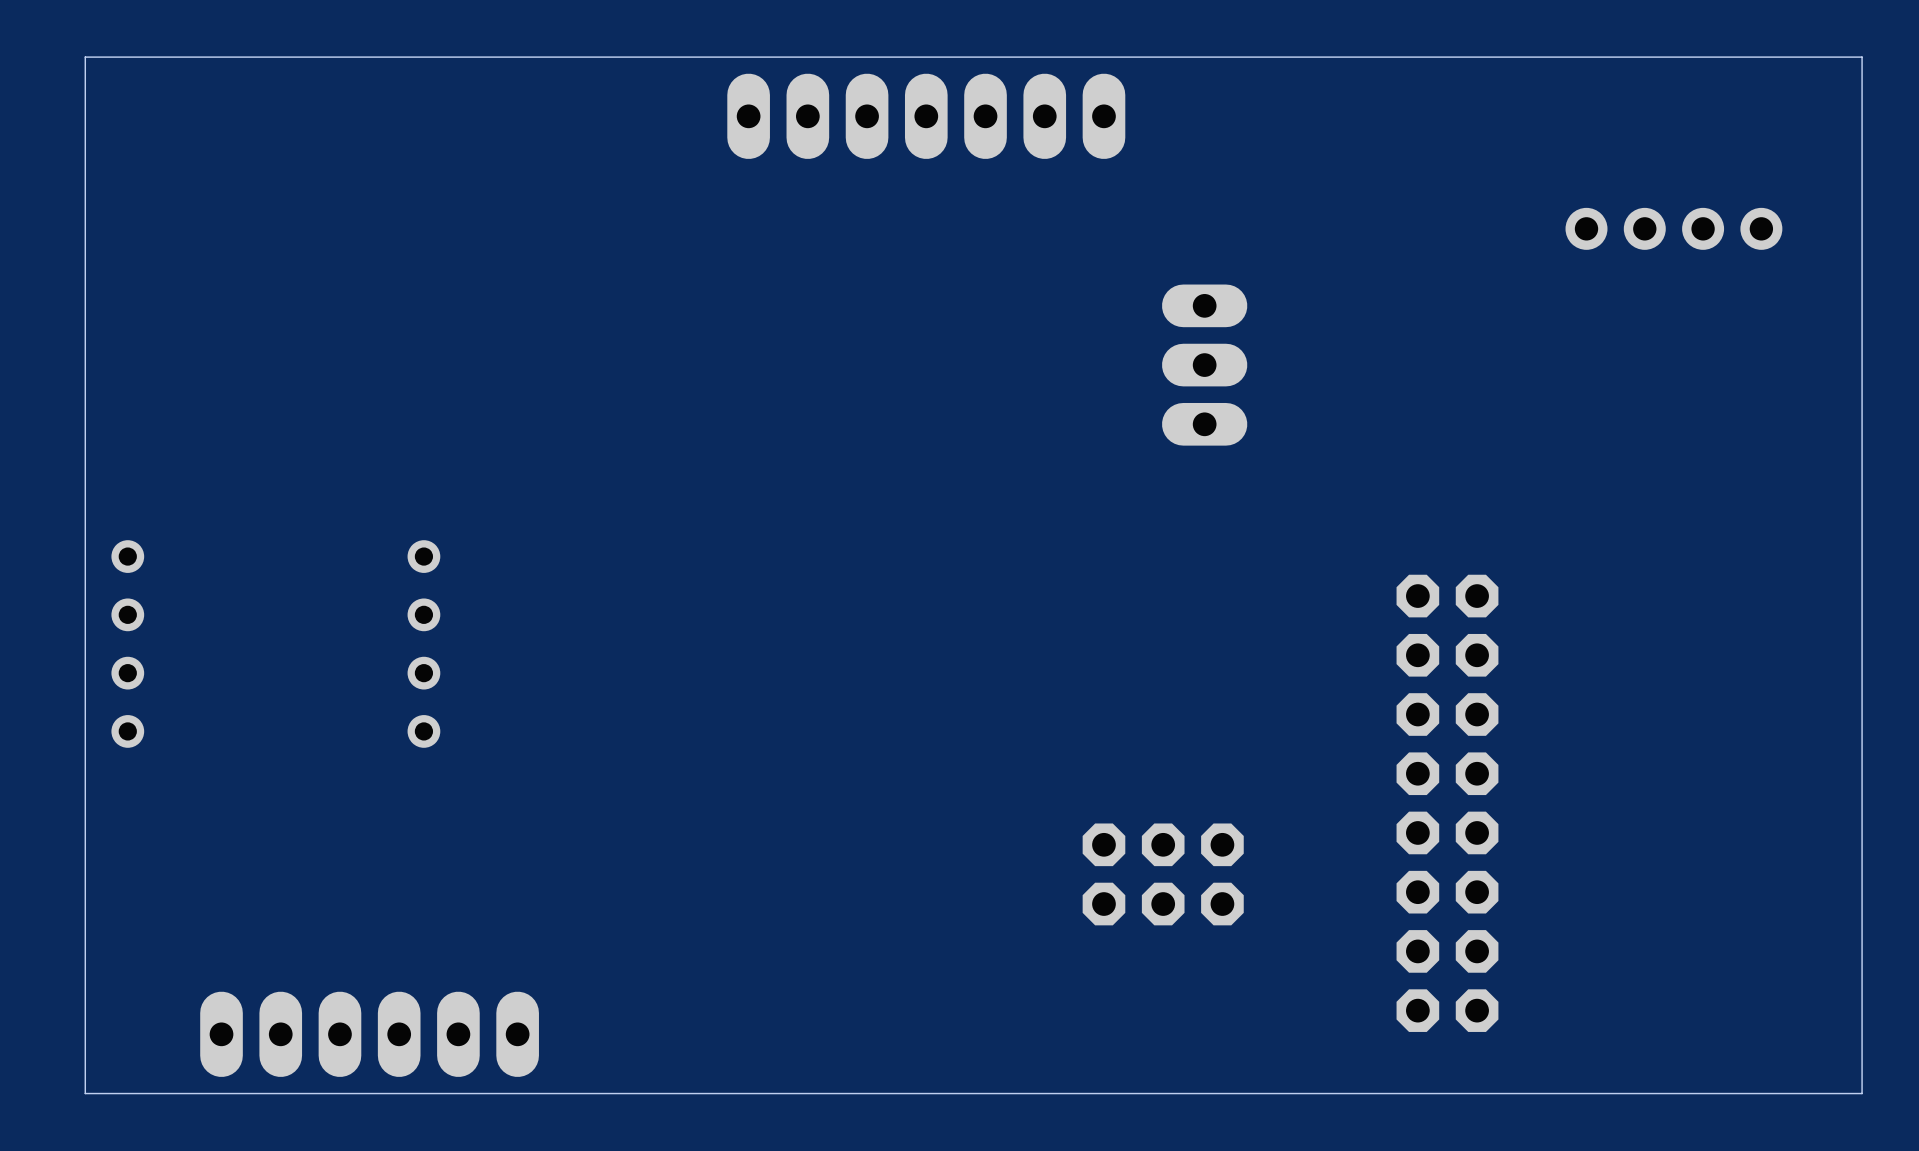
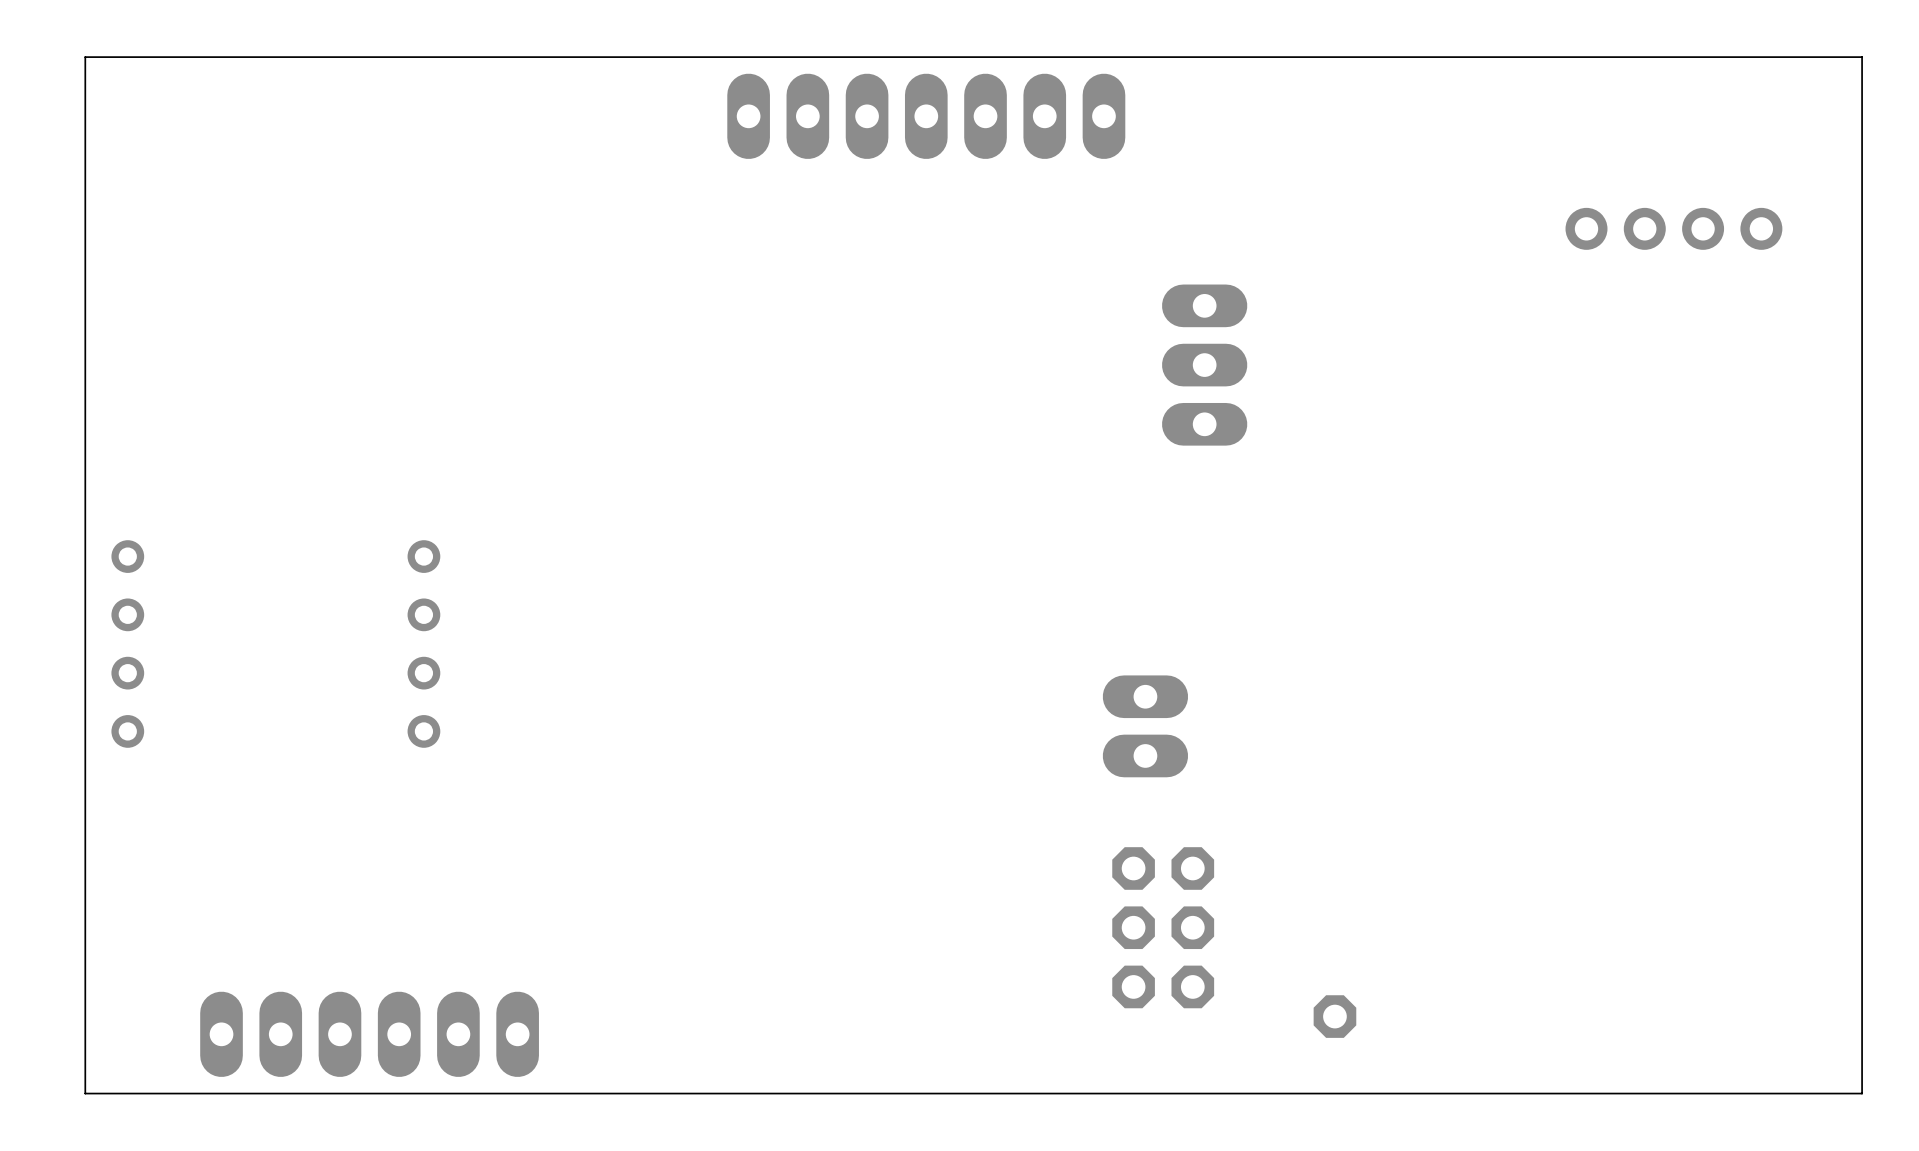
part: none -> (1145, 726)
part: (1447, 803) -> none
part rotation: 0° (1163, 874) -> 90° clockwise (1163, 927)
part: none -> (1334, 1016)

